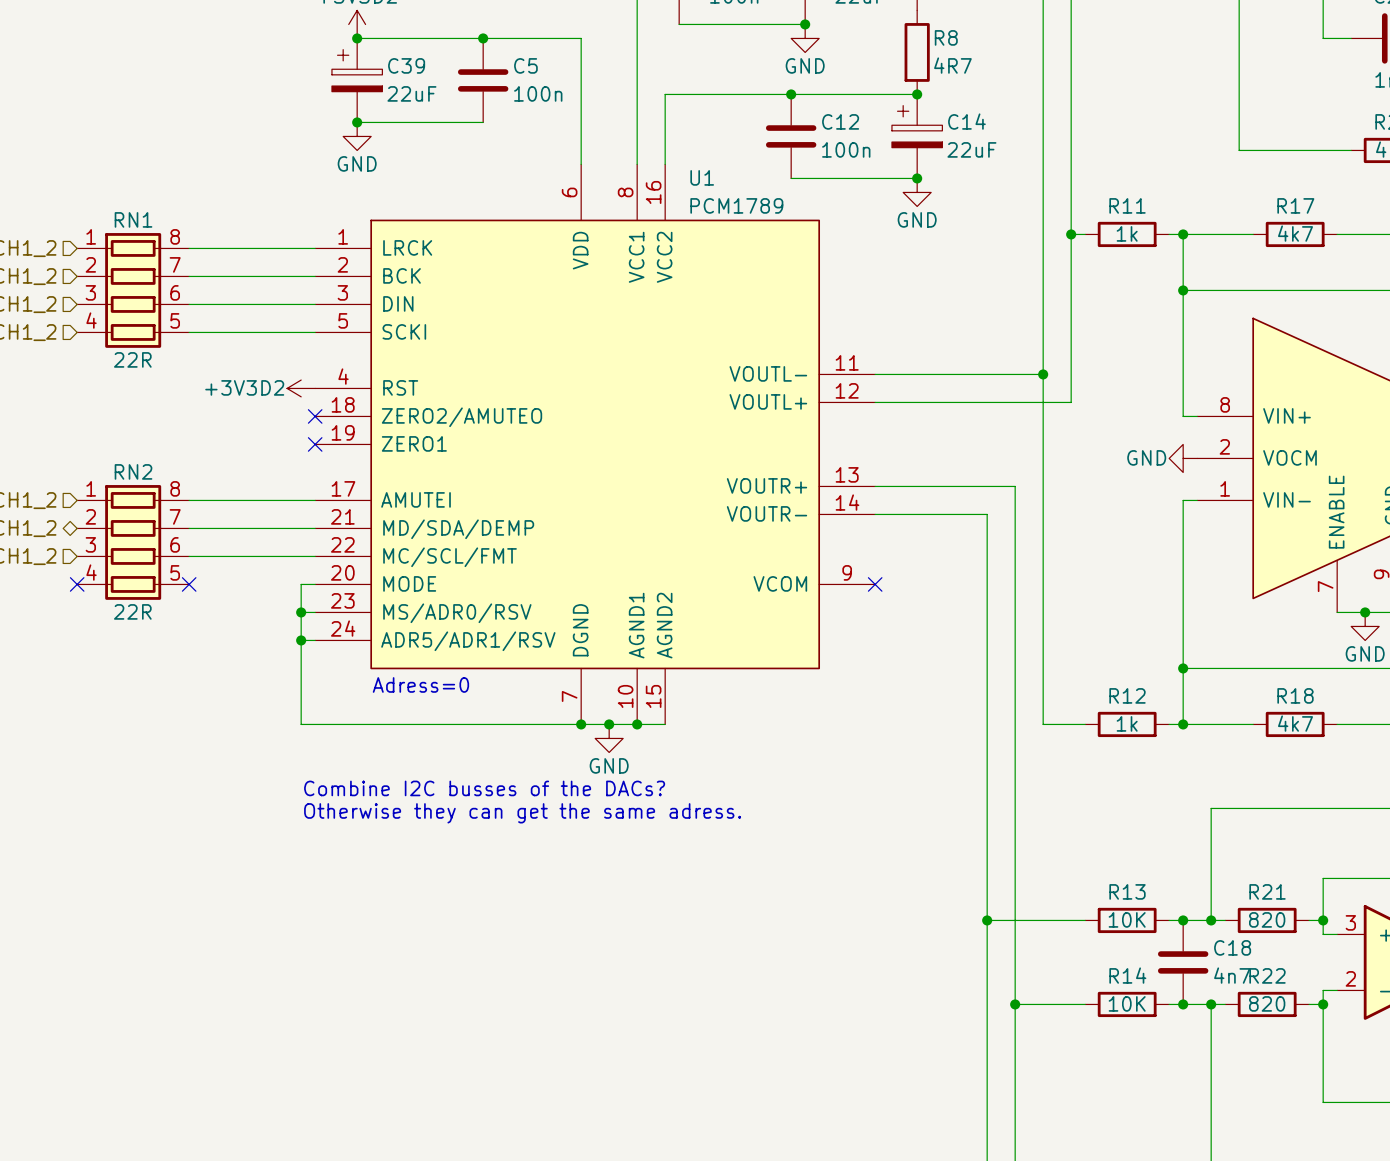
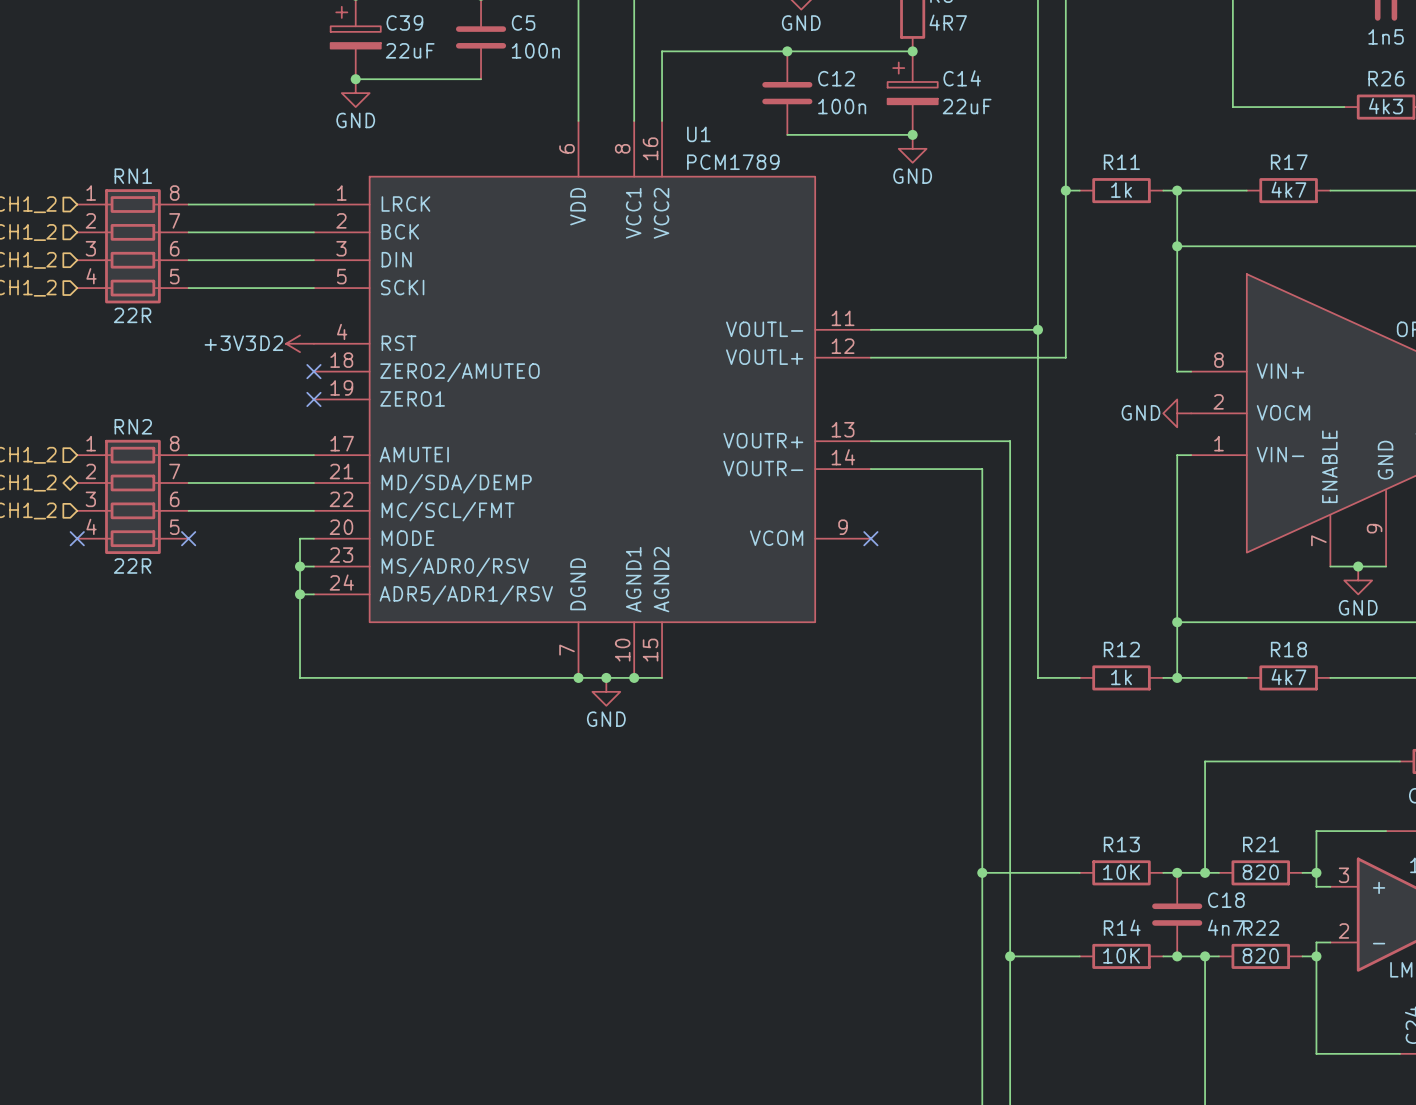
text: Adress=0 (420, 684) -> none
text: Combine I2C busses of the DACs? (484, 788) -> none
text: Otherwise they can get the same adress. (522, 813) -> none

